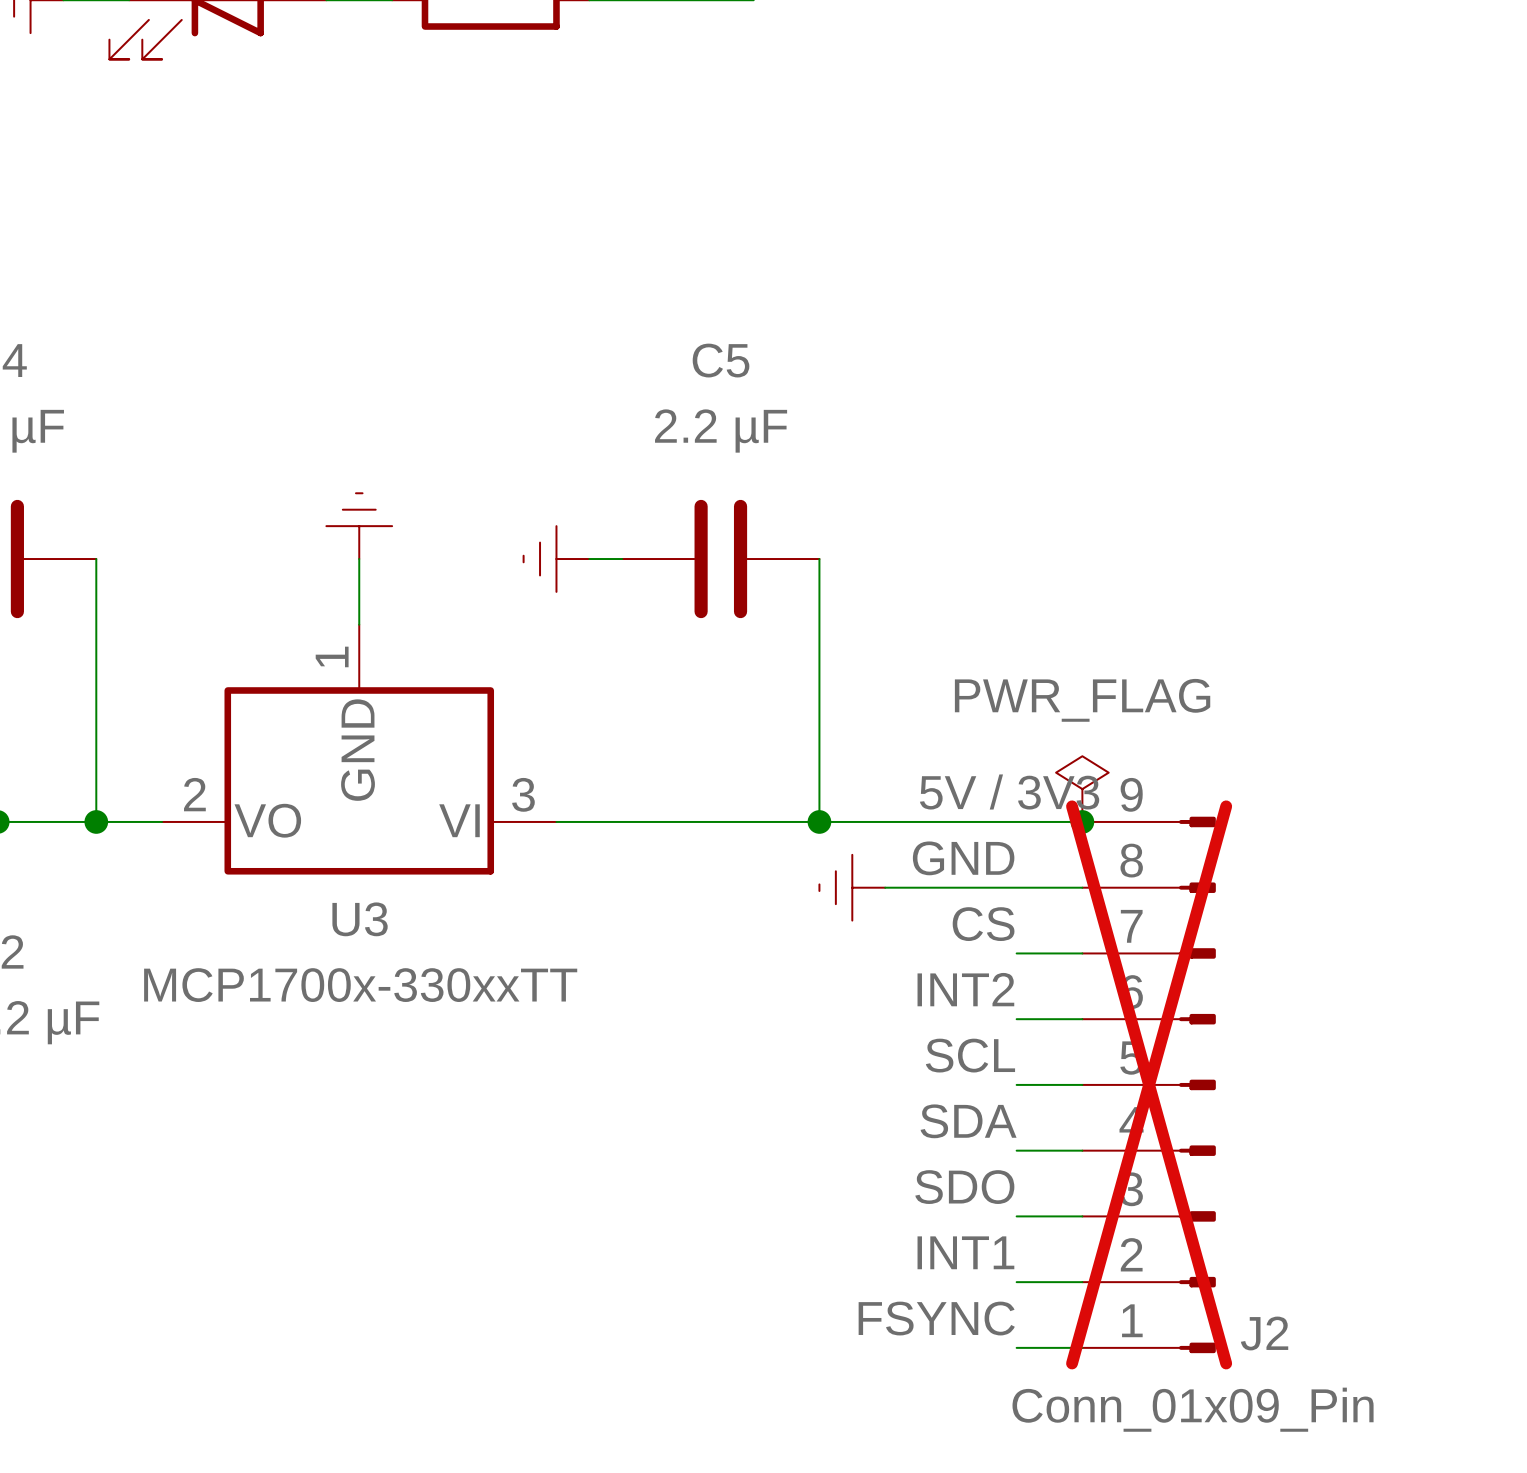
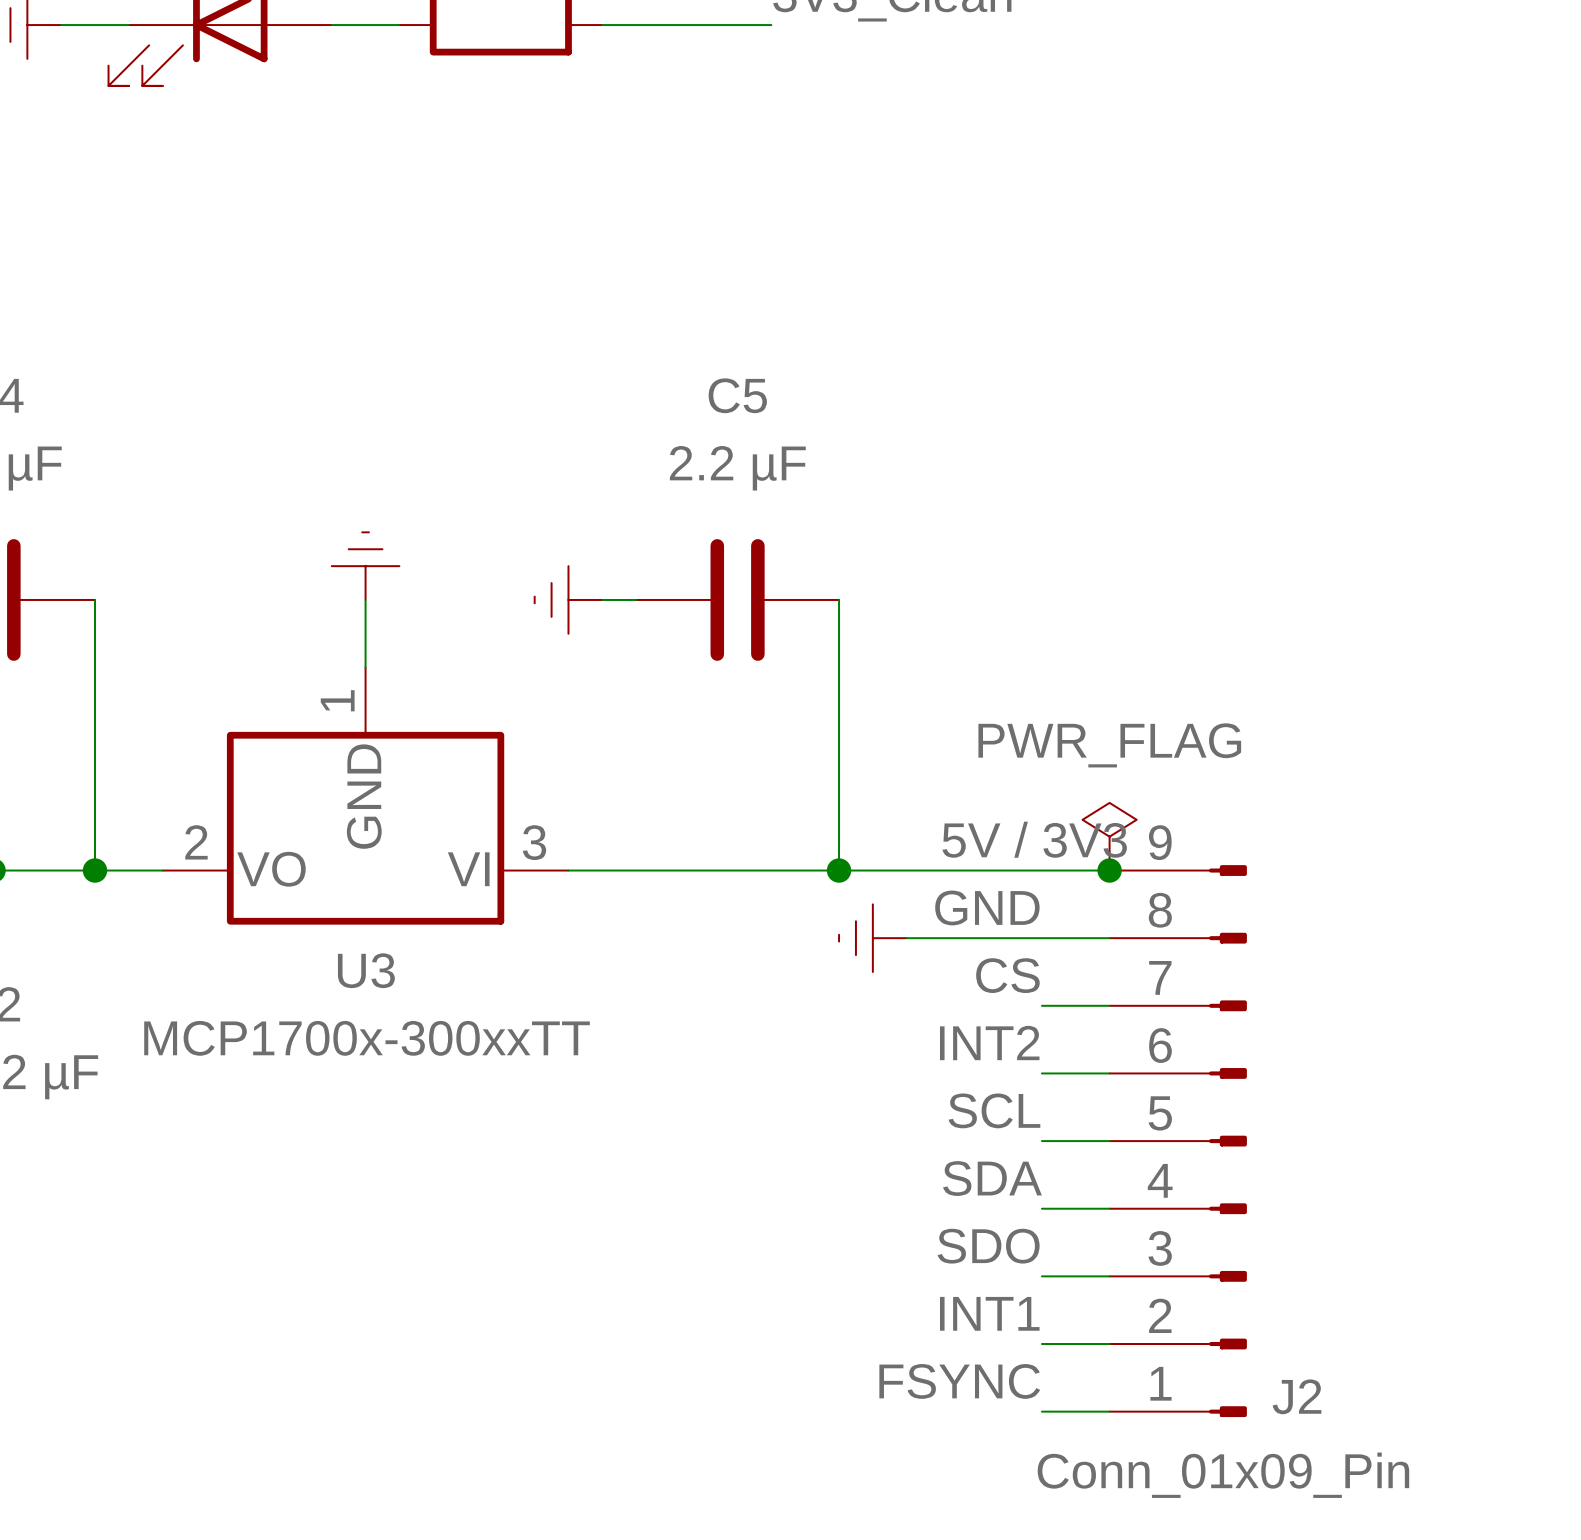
U3 value: MCP1700x-330xxTT (360, 985) -> MCP1700x-300xxTT (367, 1038)
J2 do-not-place cross: (1149, 1084) -> none

